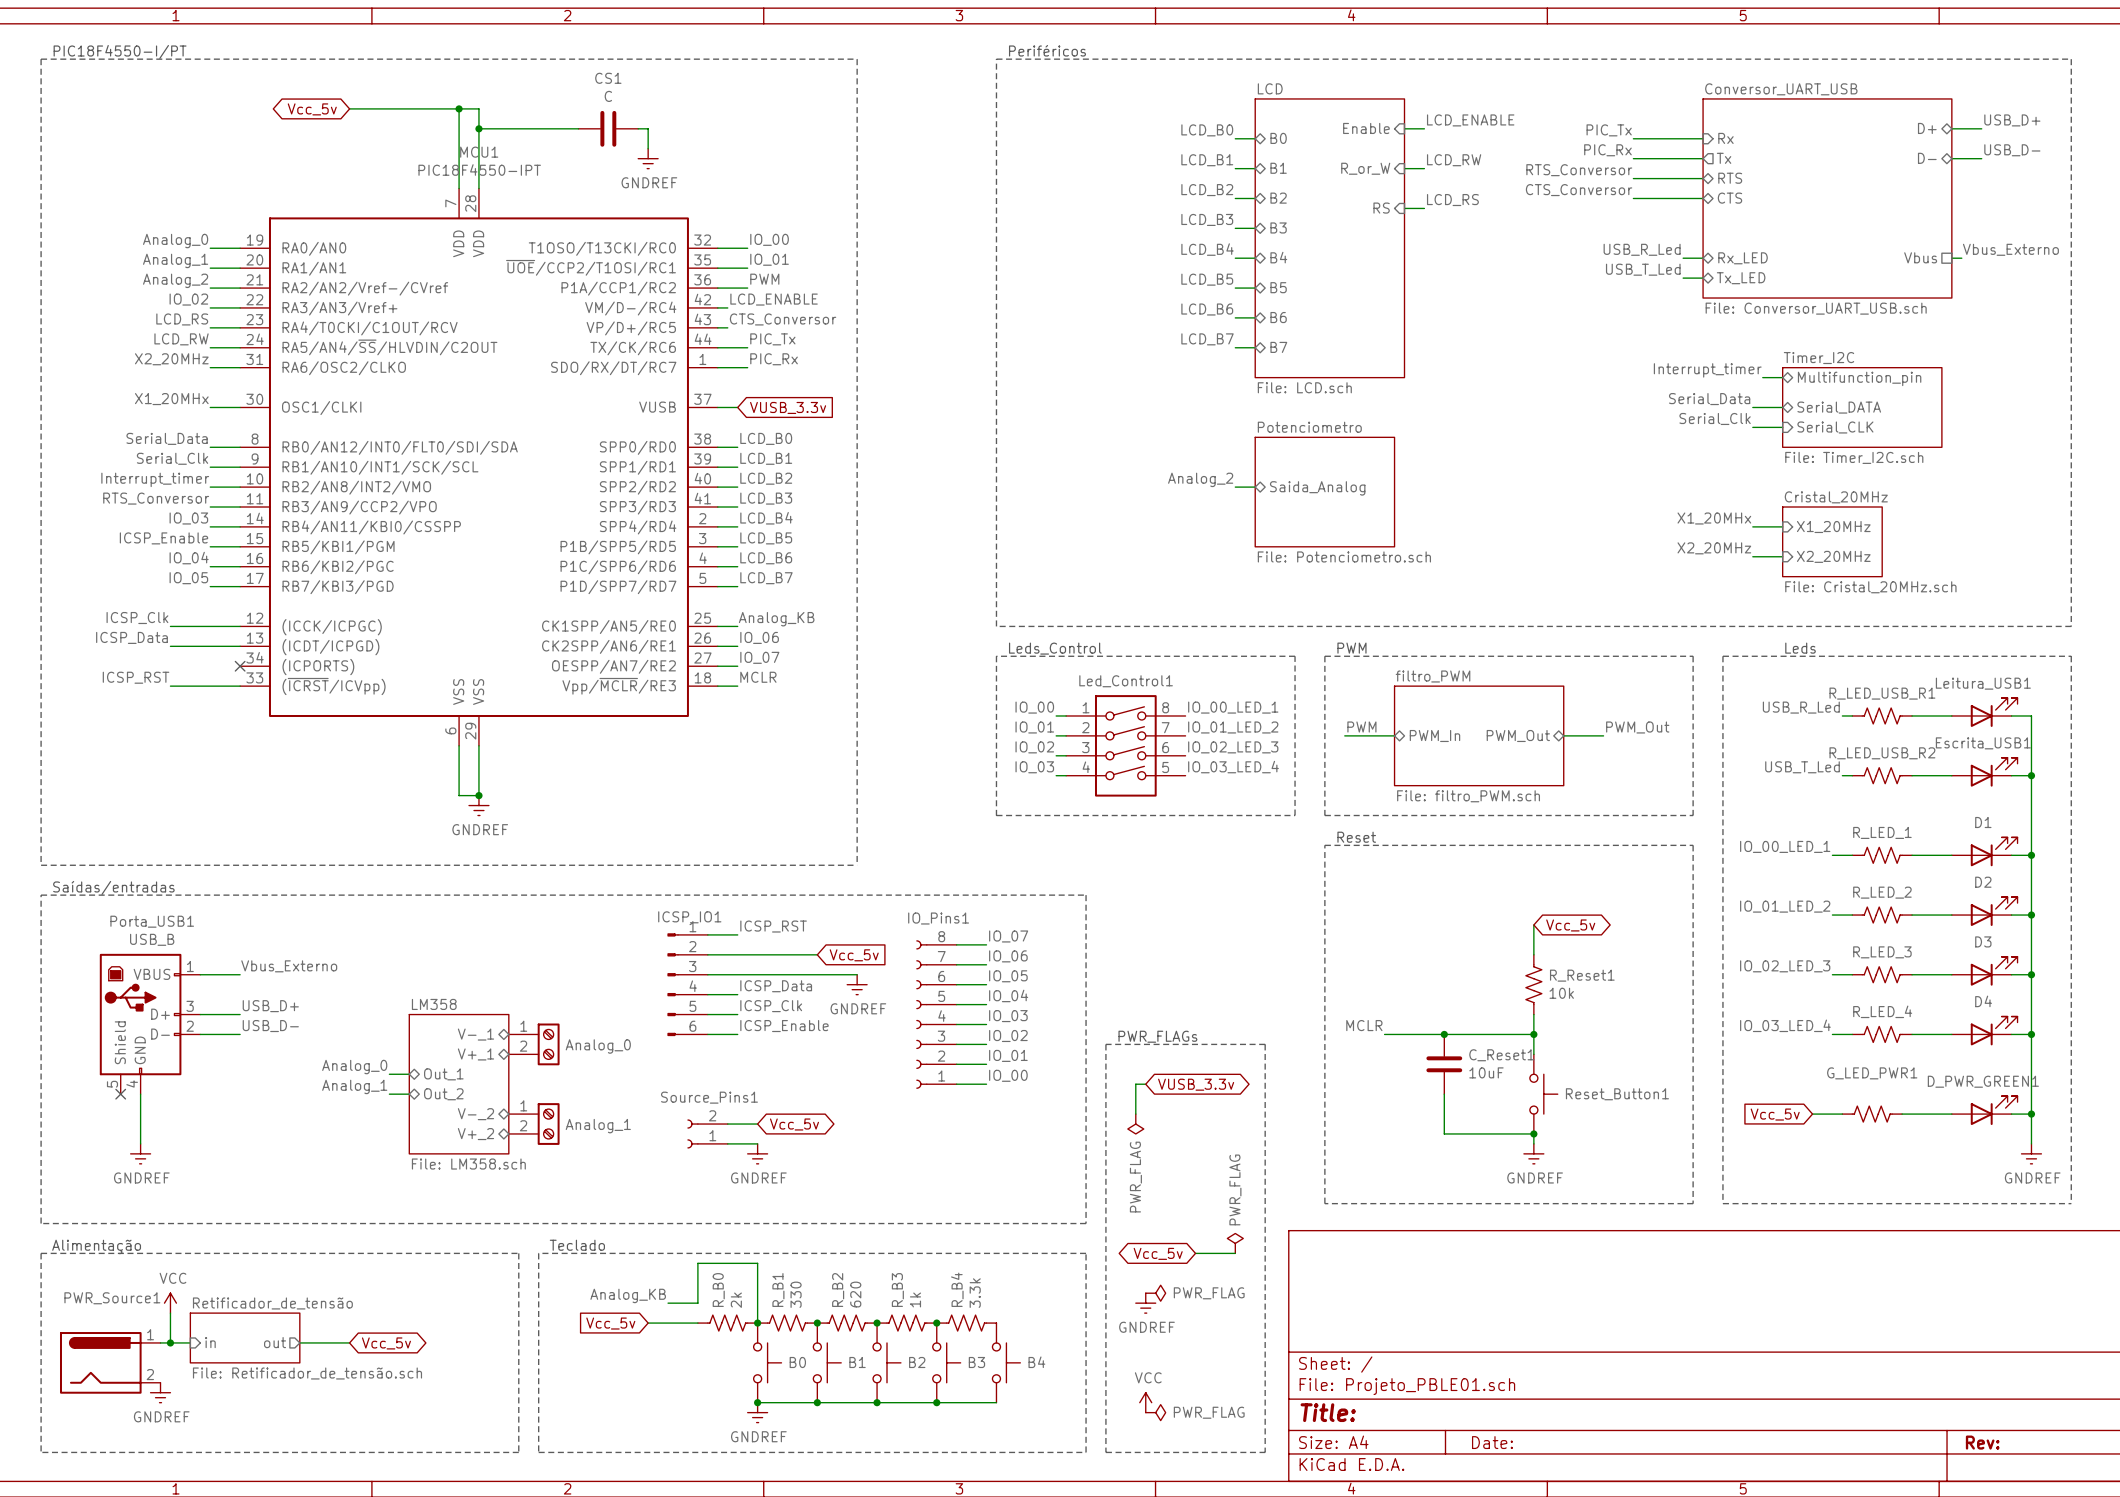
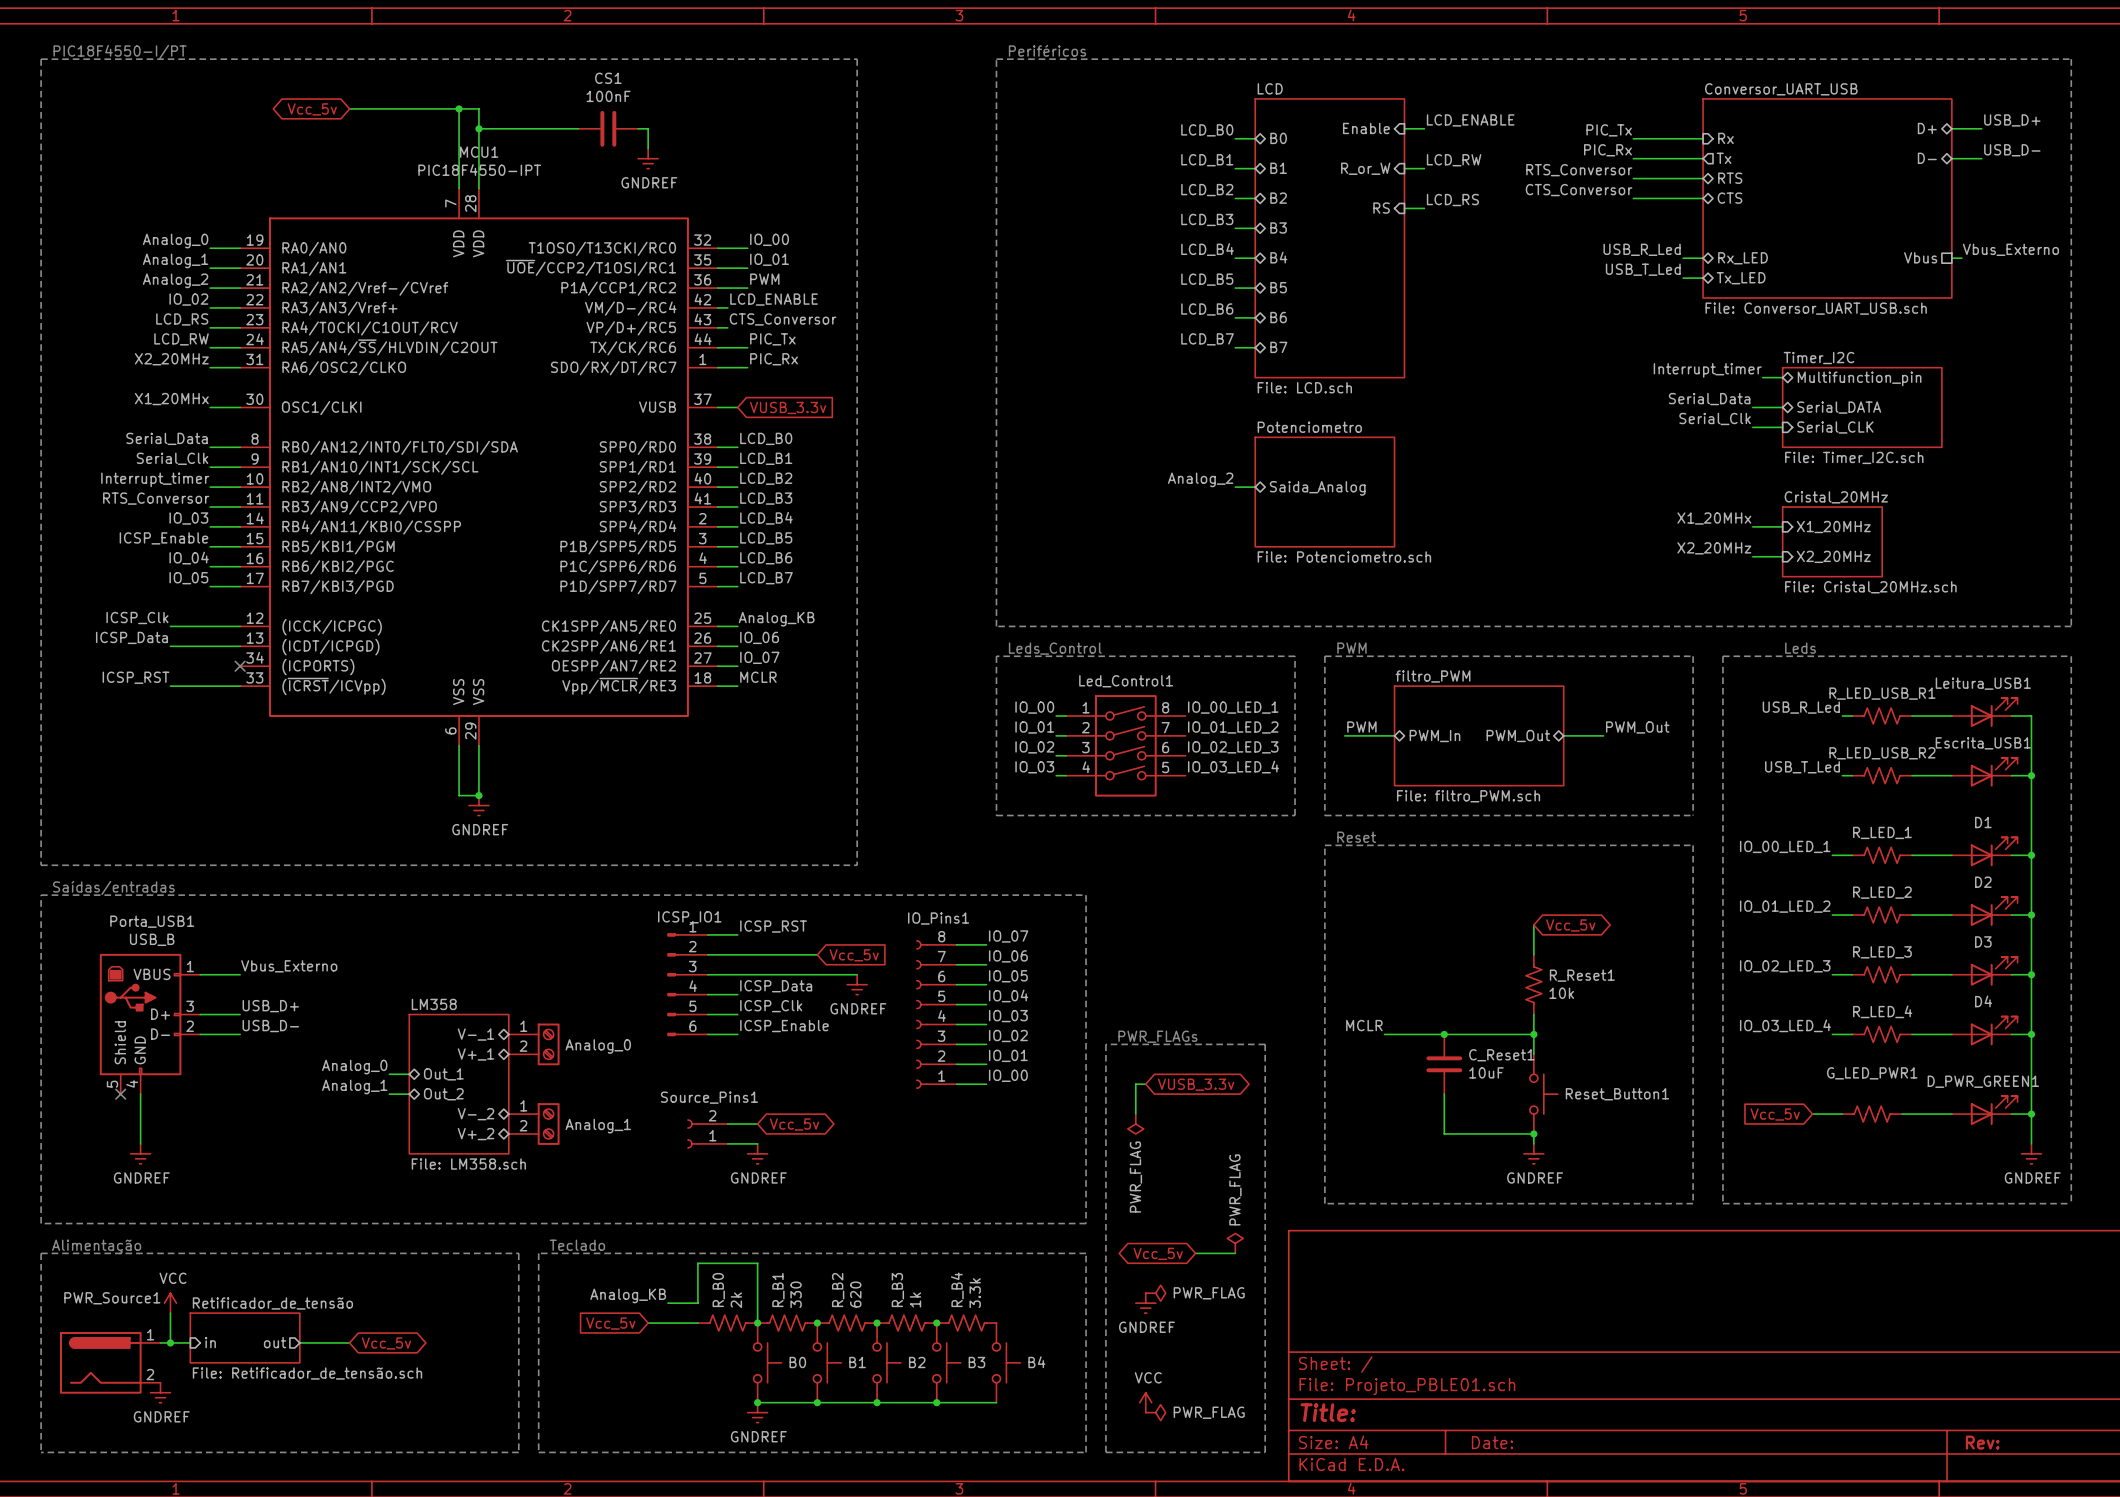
CS1 value: C (608, 96) -> 100nF (608, 96)

